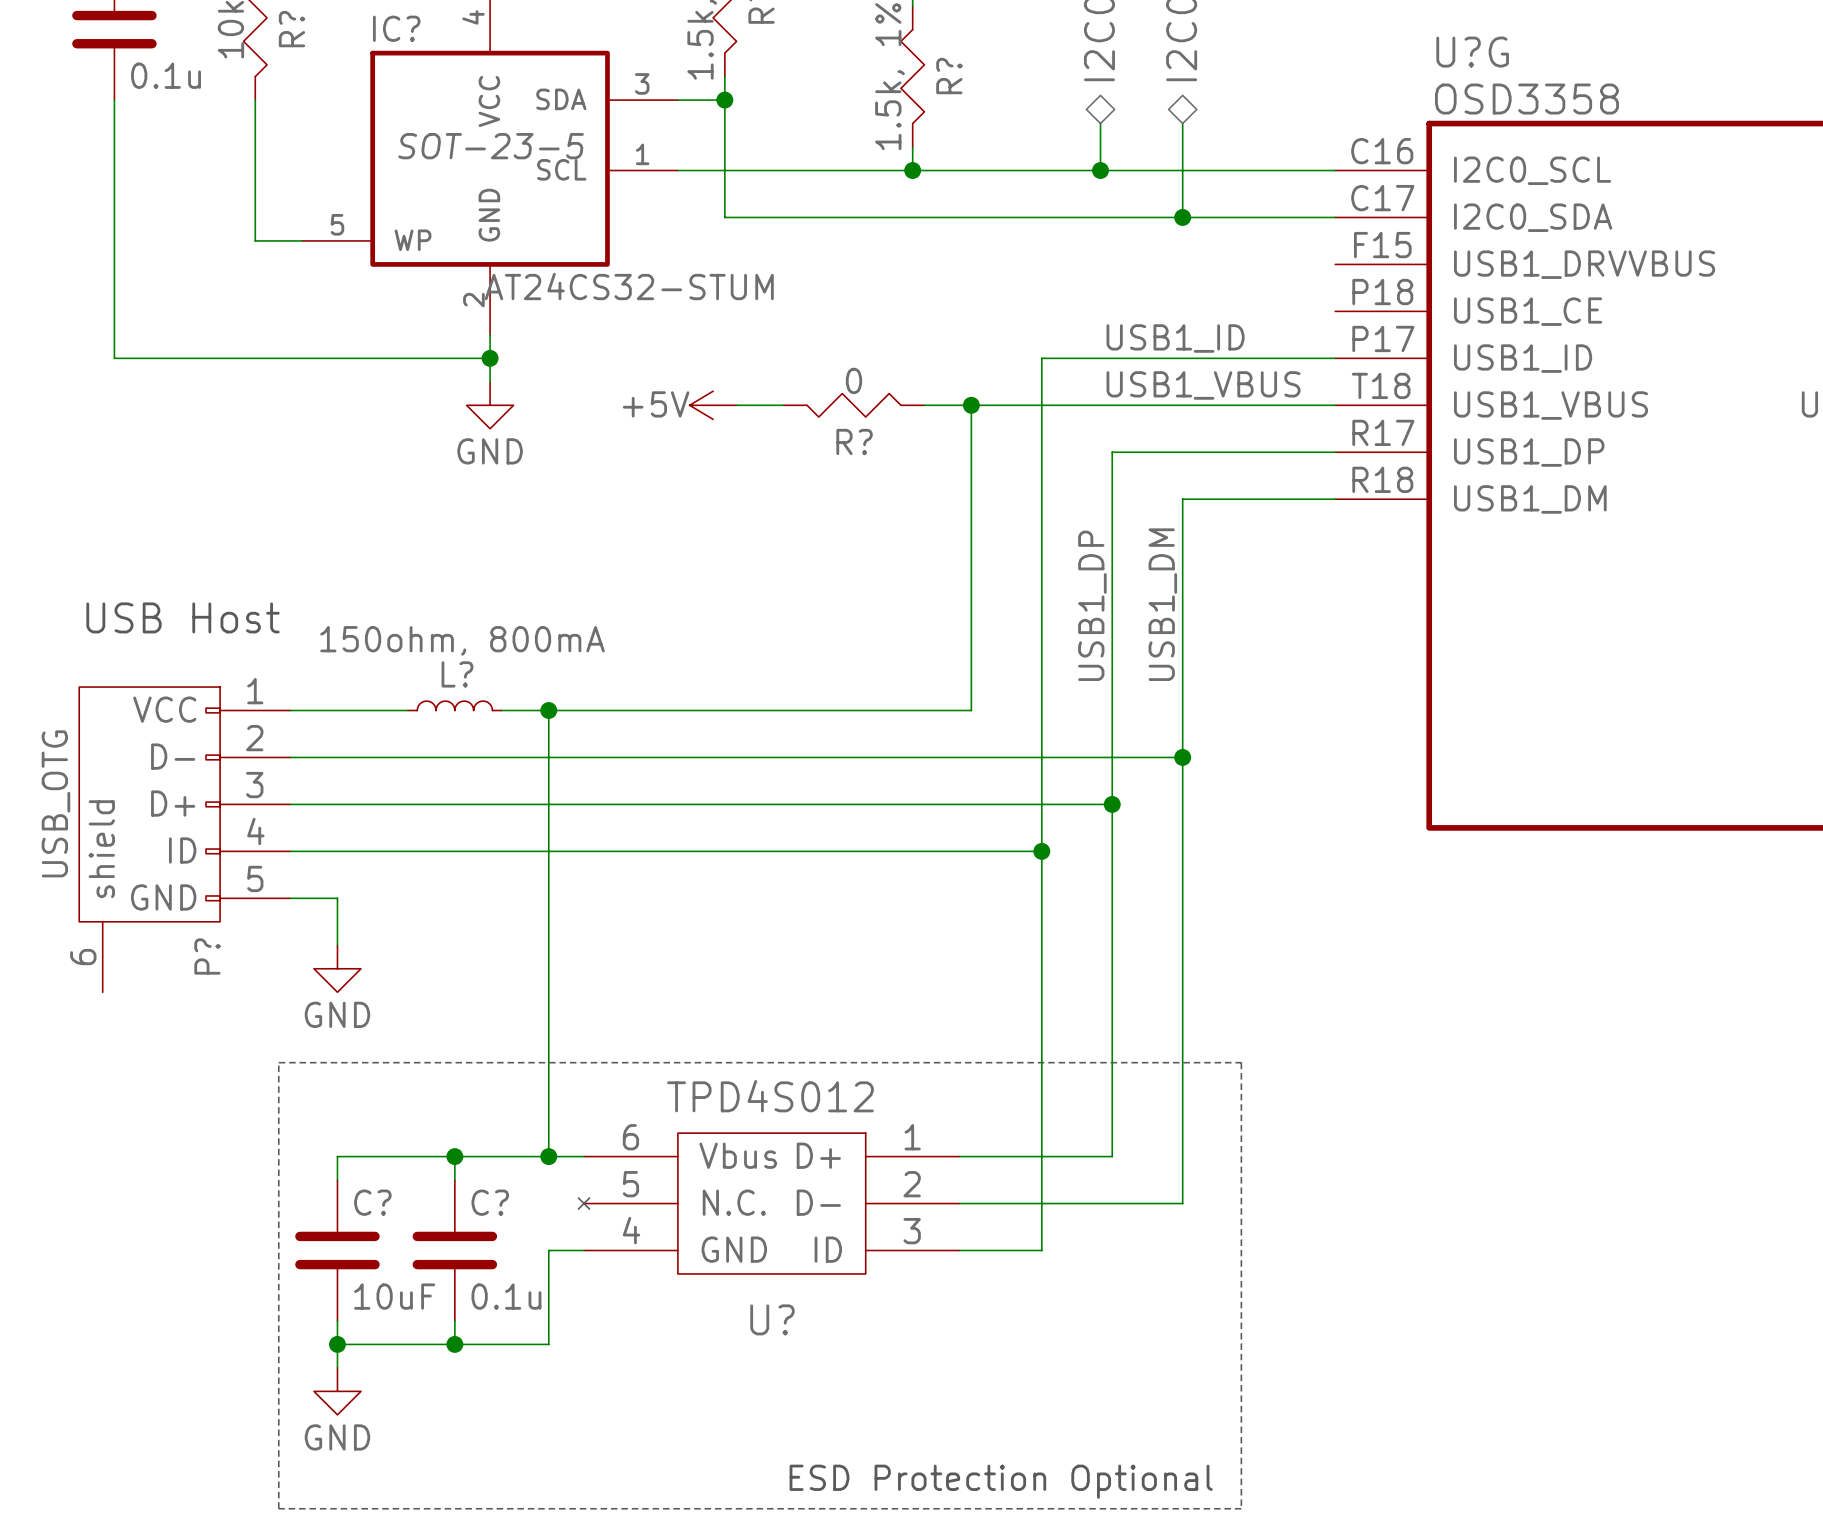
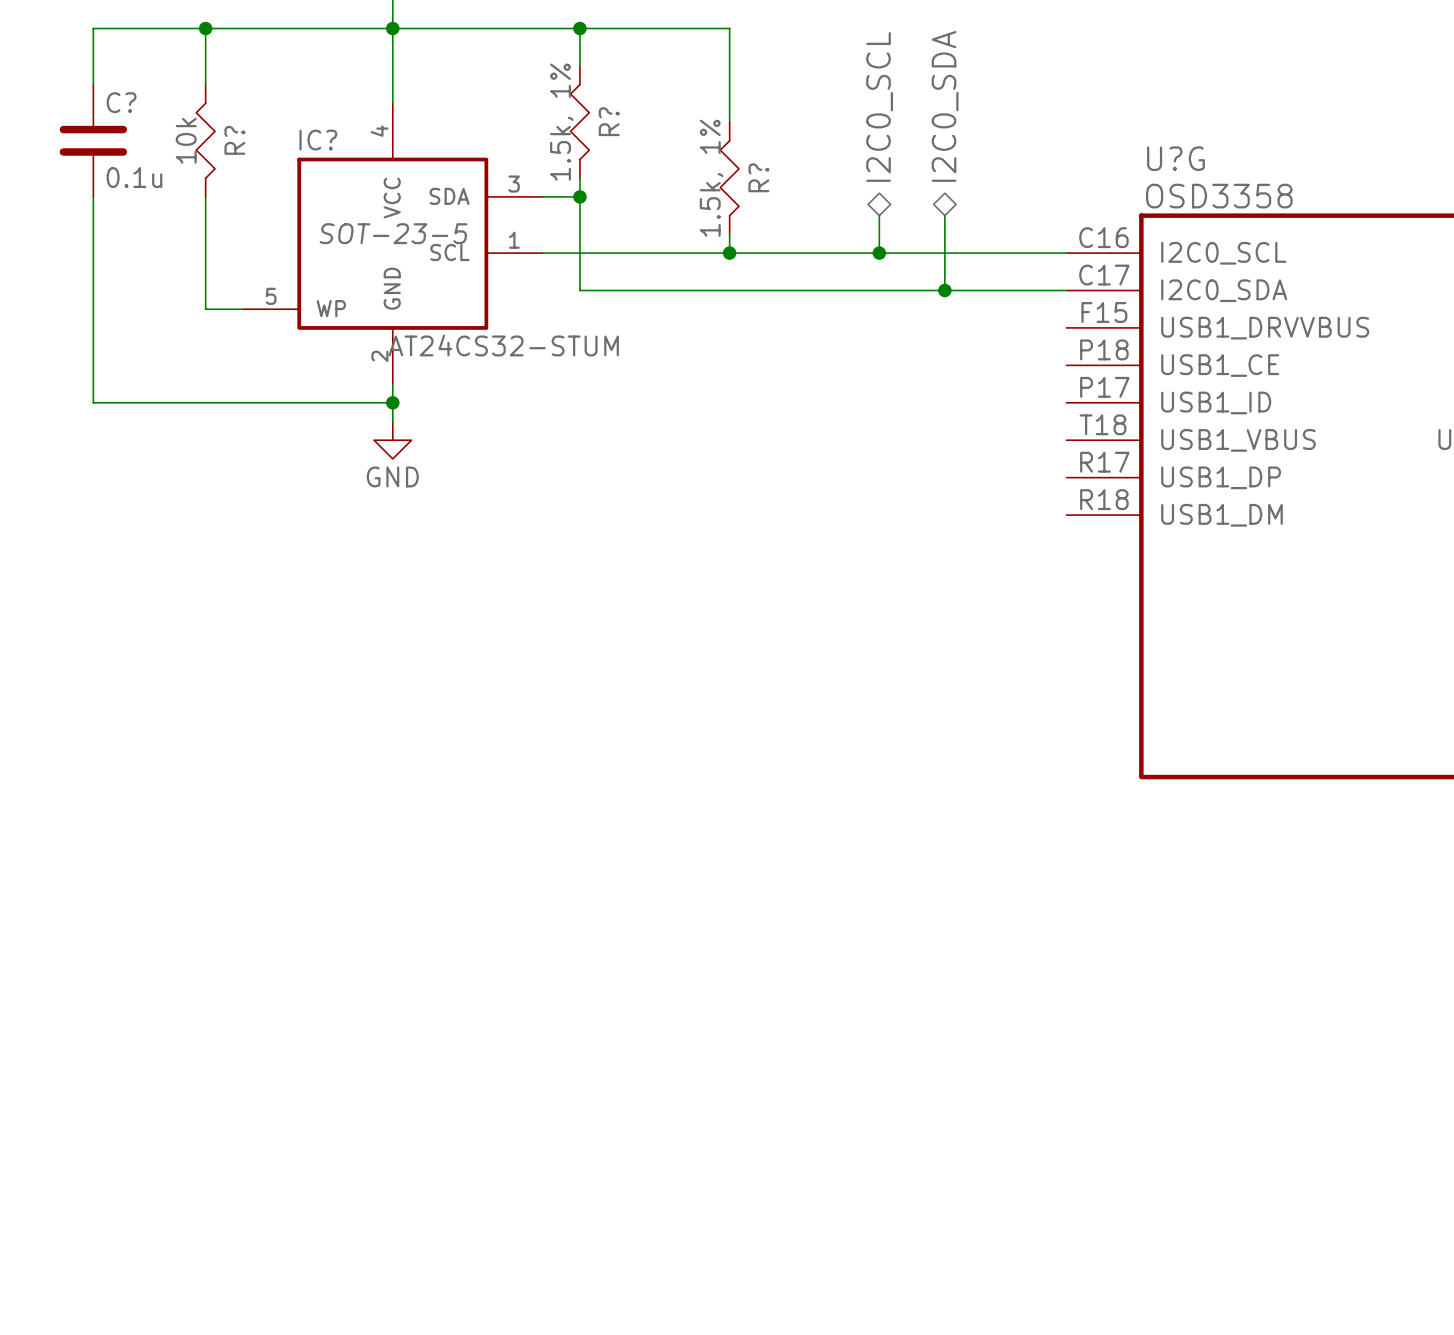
label: USB1_ID (1175, 338) -> none
wire: (1335, 358) (1041, 358) (1041, 1250) (959, 1250) -> none
label: USB1_VBUS (1203, 385) -> none
power symbol: +5V (713, 405) -> none
wire: (736, 405) (783, 405) -> none
R?: 0 (853, 405) -> none
wire: (924, 405) (1335, 405) -> none
wire: (971, 405) (971, 710) (501, 710) -> none
junction: (971, 405) -> none
wire: (1335, 452) (1112, 452) (1112, 1156) (959, 1156) -> none
wire: (1335, 499) (1182, 499) (1182, 1203) (959, 1203) -> none
label: USB1_DM (1162, 604) -> none
label: USB1_DP (1092, 605) -> none
text: USB Host (183, 617) -> none
L?: 150ohm, 800mA (454, 705) -> none
wire: (290, 710) (407, 710) -> none
wire: (548, 710) (548, 1156) -> none
junction: (548, 710) -> none
wire: (290, 757) (1182, 757) -> none
junction: (1182, 757) -> none
wire: (290, 804) (1112, 804) -> none
junction: (1112, 804) -> none
P?: USB_OTG (184, 839) -> none
wire: (290, 851) (1041, 851) -> none
junction: (1041, 851) -> none
wire: (290, 898) (337, 898) (337, 945) -> none
power symbol: GND (337, 968) -> none
line: (278, 1062) (1241, 1062) (1241, 1508) (278, 1508) (278, 1062) -> none
wire: (454, 1156) (454, 1180) -> none
junction: (454, 1156) -> none
junction: (548, 1156) -> none
wire: (583, 1156) (337, 1156) (337, 1180) -> none
U?: TPD4S012 (769, 1203) -> none
C?: 10uF (337, 1250) -> none
C?: 0.1u (454, 1250) -> none
wire: (583, 1250) (548, 1250) (548, 1344) (337, 1344) -> none
wire: (337, 1320) (337, 1367) -> none
wire: (454, 1320) (454, 1344) -> none
junction: (337, 1344) -> none
junction: (454, 1344) -> none
power symbol: GND (337, 1391) -> none
text: ESD Protection Optional (1001, 1481) -> none

